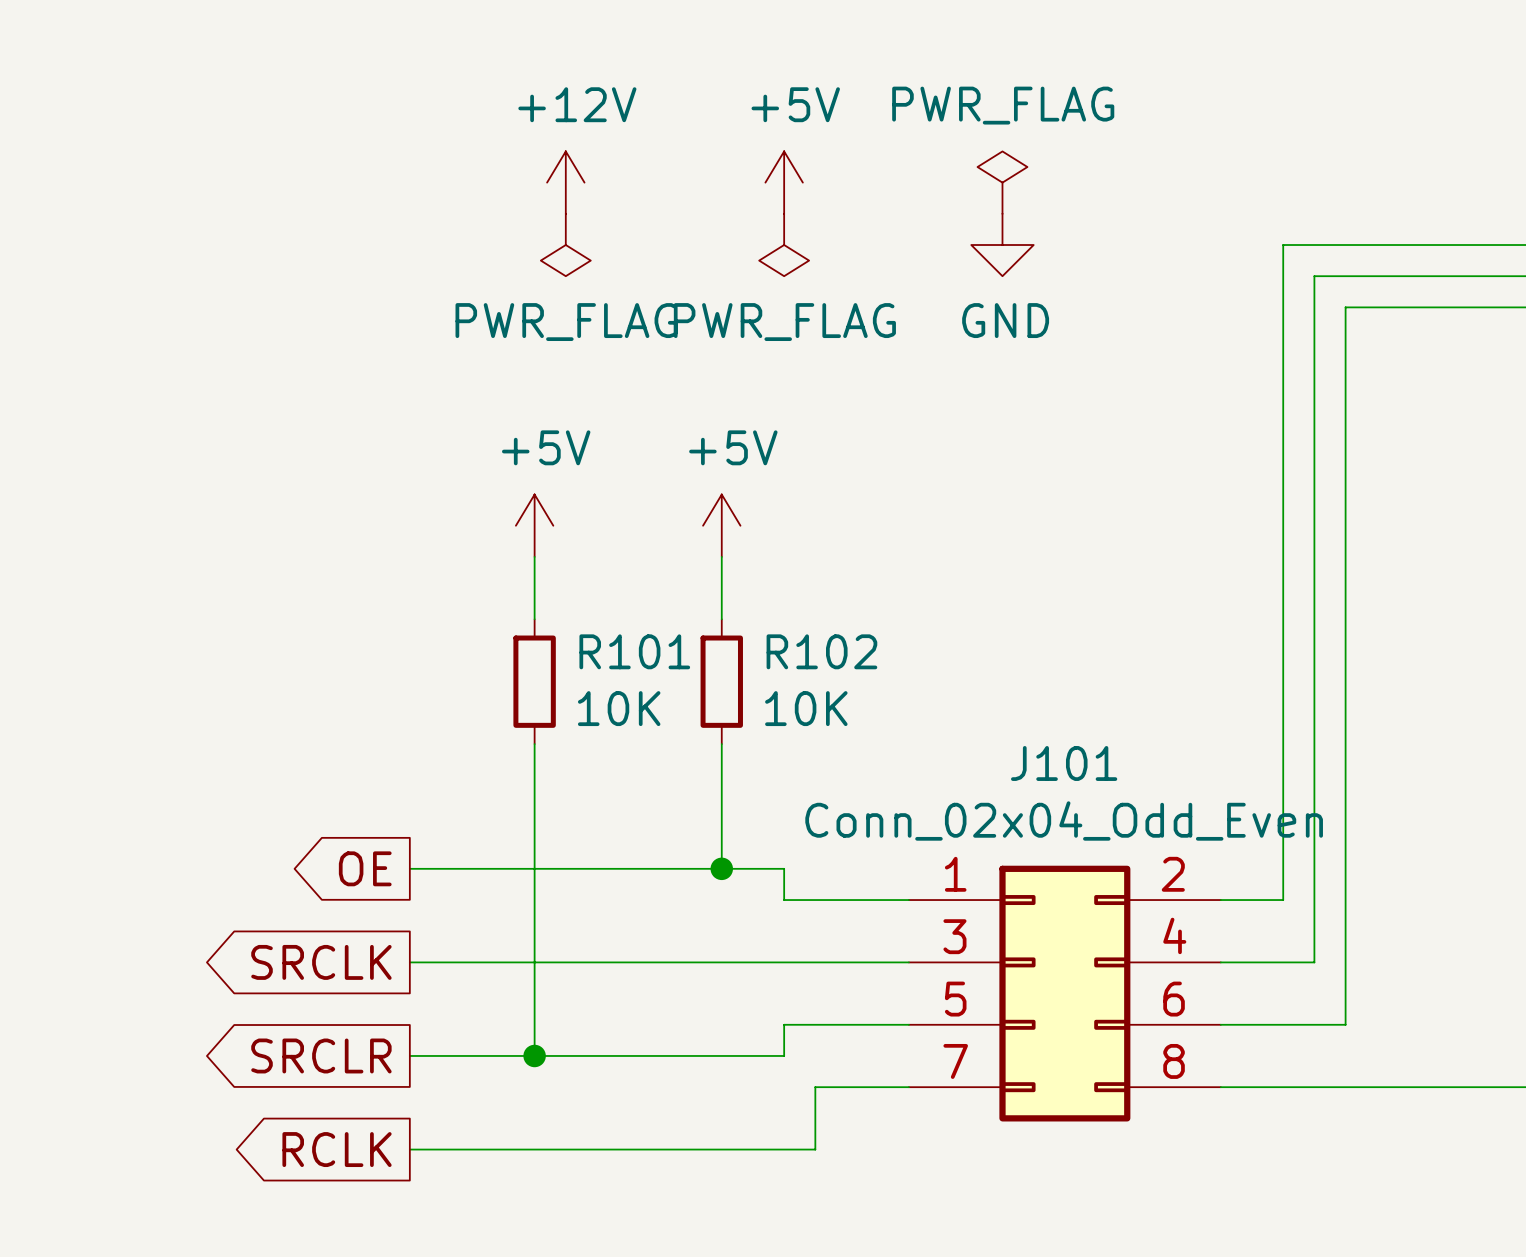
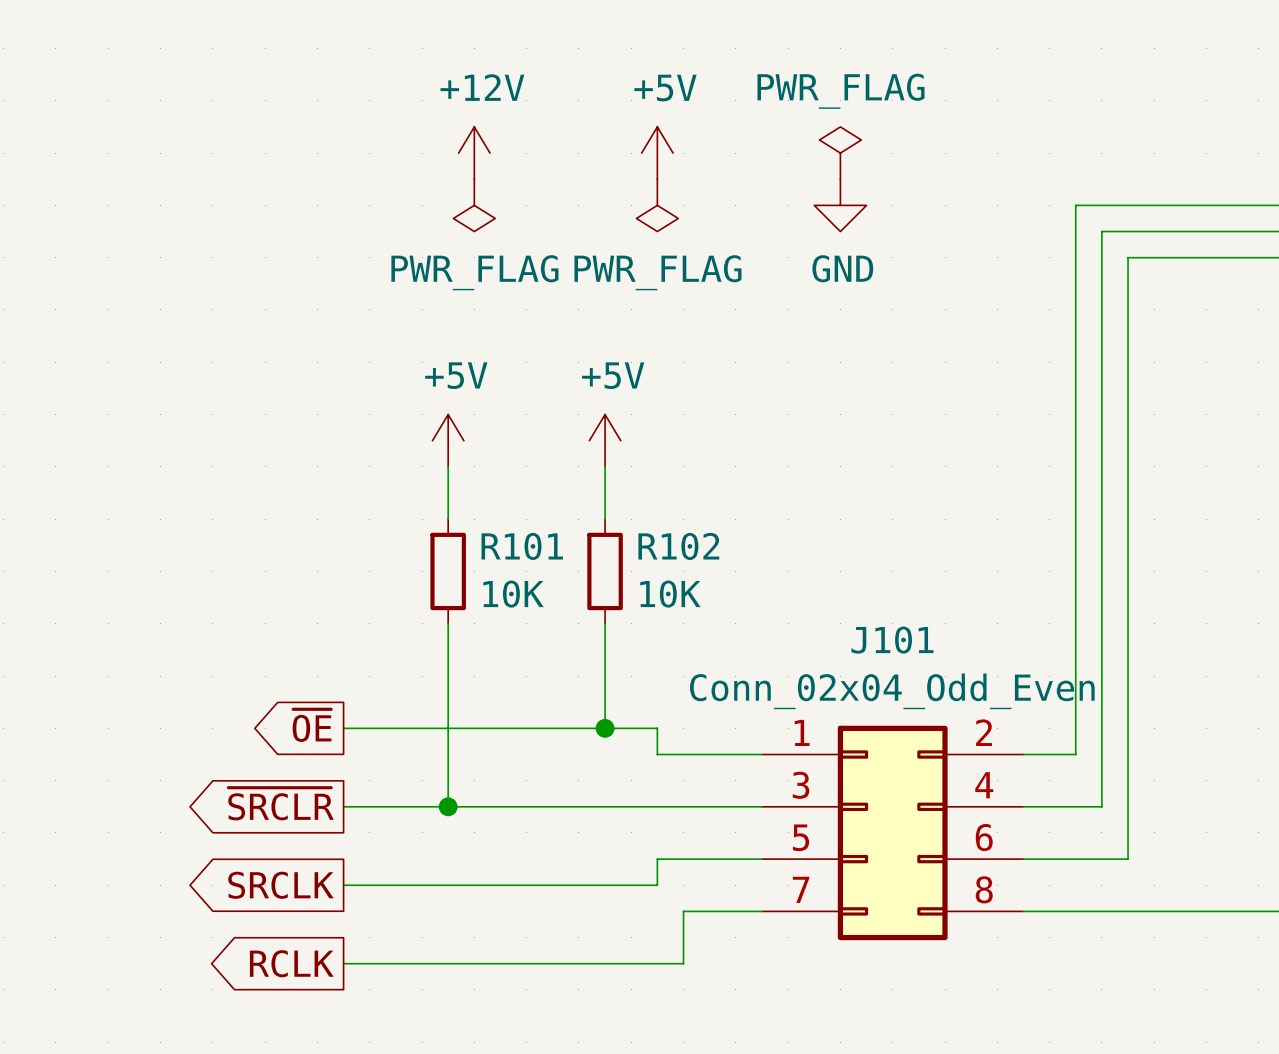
global label: OE (365, 868) -> ~{OE} (312, 725)
global label: SRCLK (321, 962) -> ~{SRCLR} (281, 804)
wire: (534, 962) (534, 1055) -> none
global label: SRCLR (321, 1055) -> SRCLK (280, 885)
junction position: (534, 1055) -> (448, 806)

